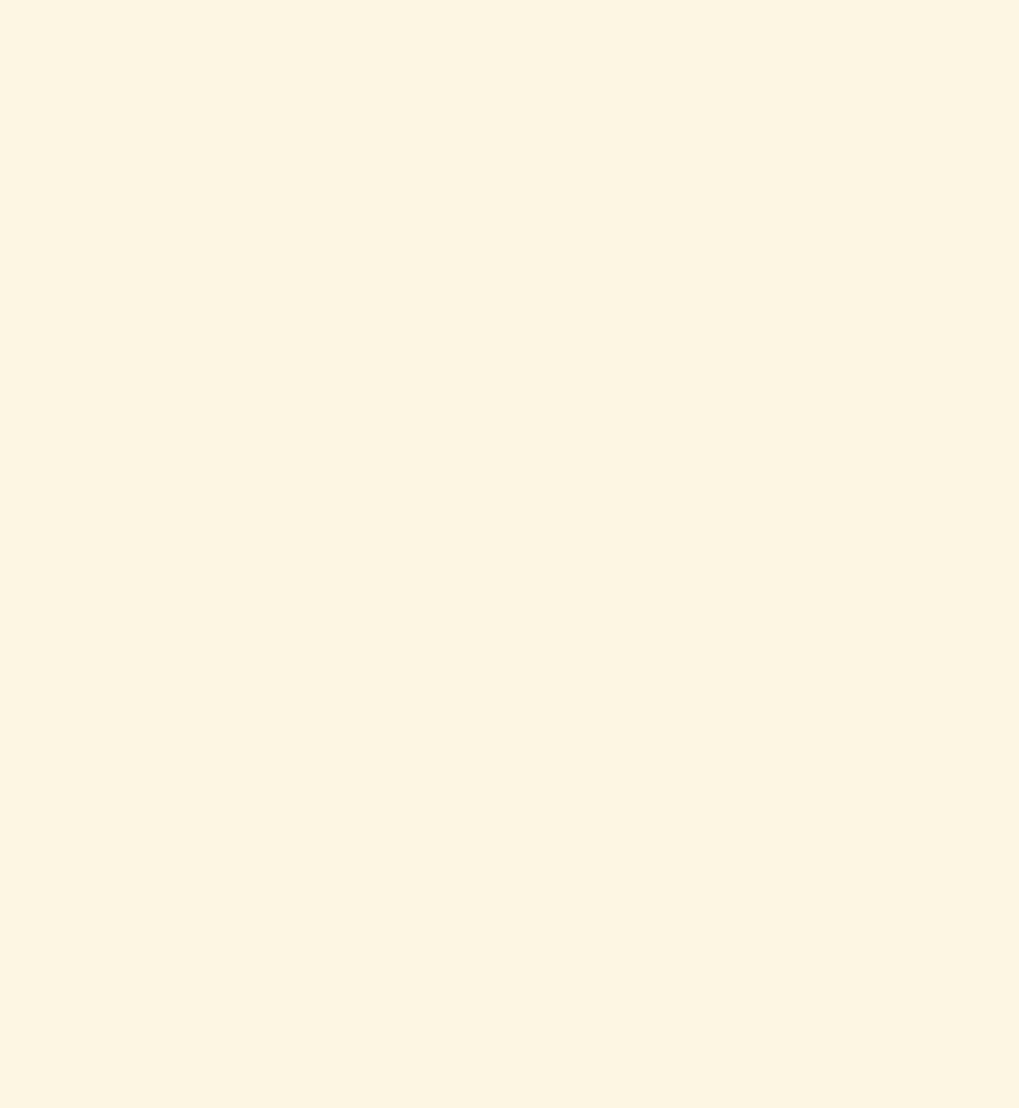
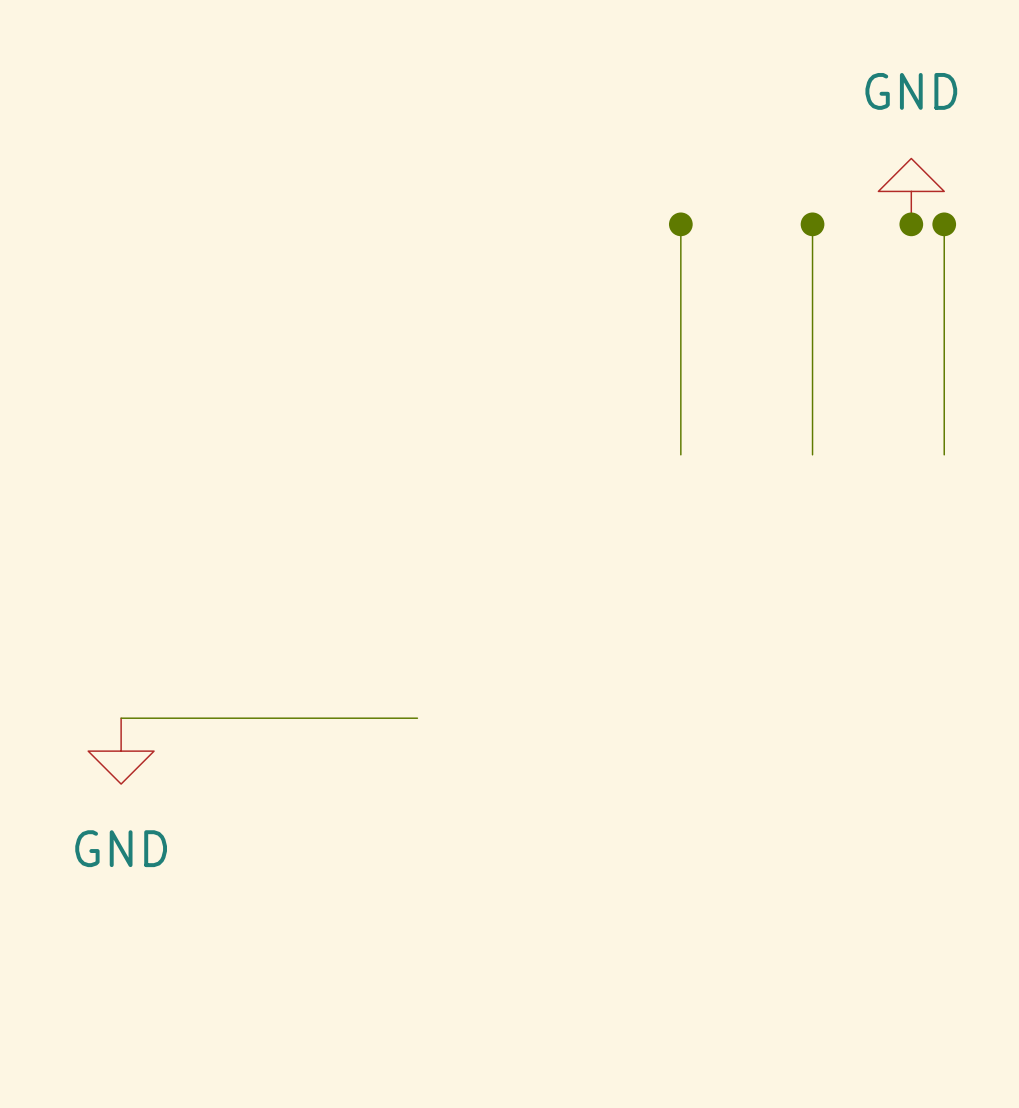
power symbol: none -> GND (911, 191)
wire: none -> (680, 224) (680, 454)
junction: none -> (680, 224)
wire: none -> (812, 224) (812, 454)
junction: none -> (812, 224)
junction: none -> (911, 224)
wire: none -> (944, 224) (944, 454)
junction: none -> (944, 224)
wire: none -> (121, 718) (417, 718)
power symbol: none -> GND (121, 751)

